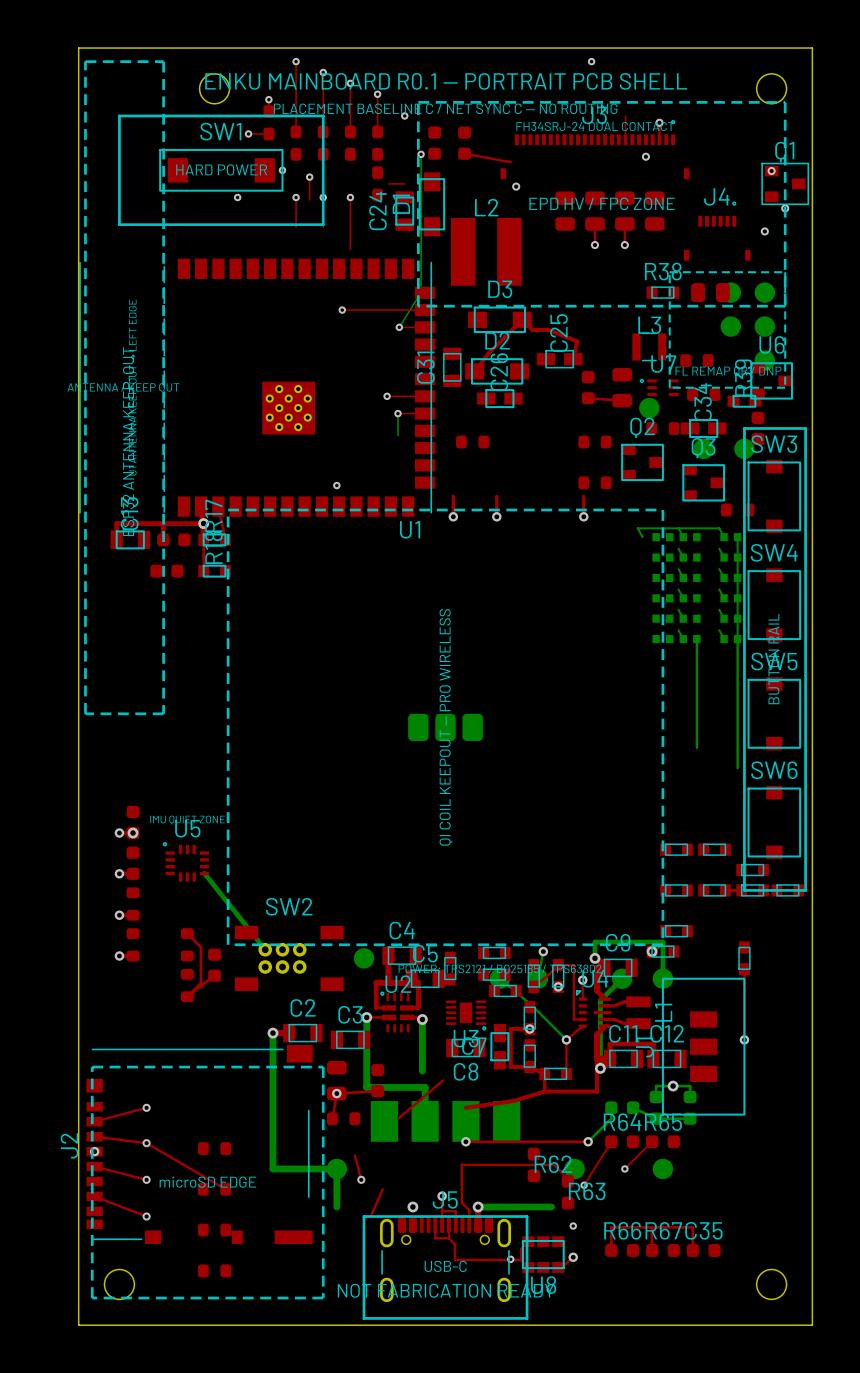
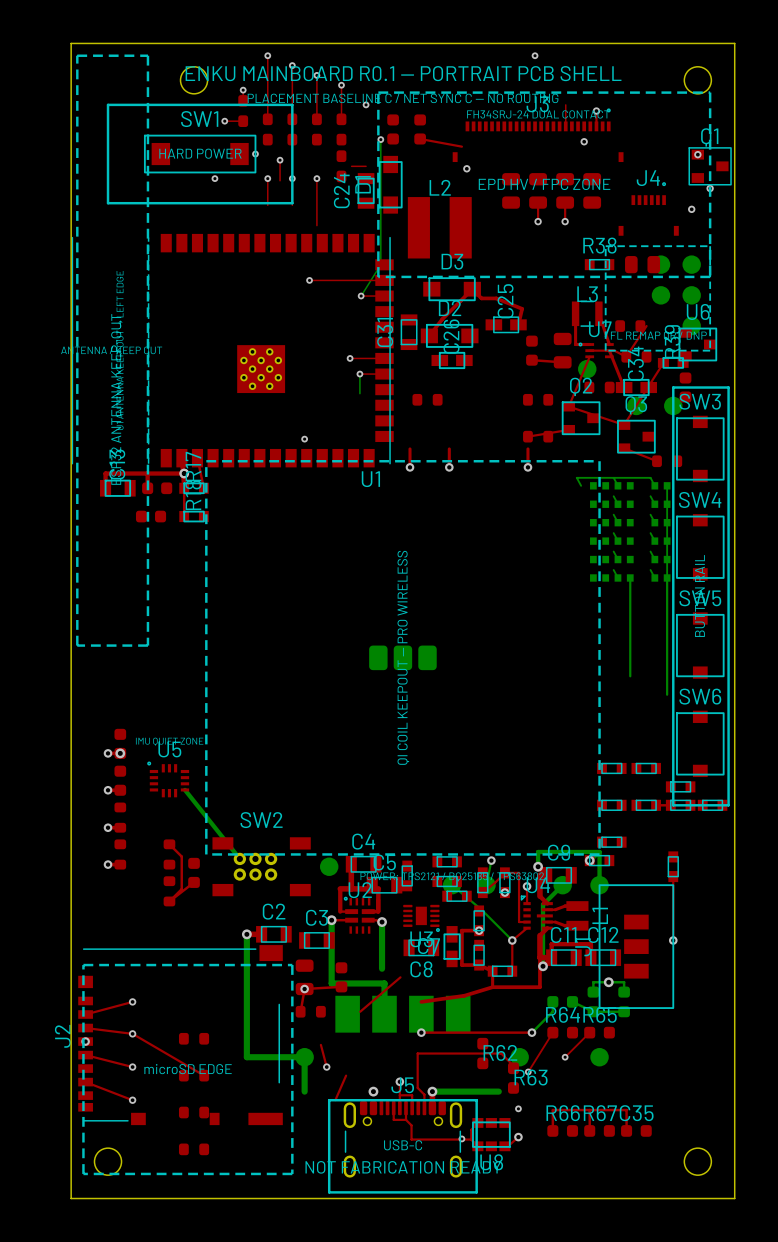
top track: none -> (575, 313) (575, 344) (589, 344)
top track: none -> (598, 313) (609, 344)
top track: none -> (646, 326) (626, 356) (614, 350) (589, 350)
top track: none -> (609, 350) (624, 387)
top track: none -> (589, 356) (568, 406) (624, 424) (663, 362)
top track: none -> (568, 429) (527, 436)
top track: none -> (624, 448) (656, 461)

